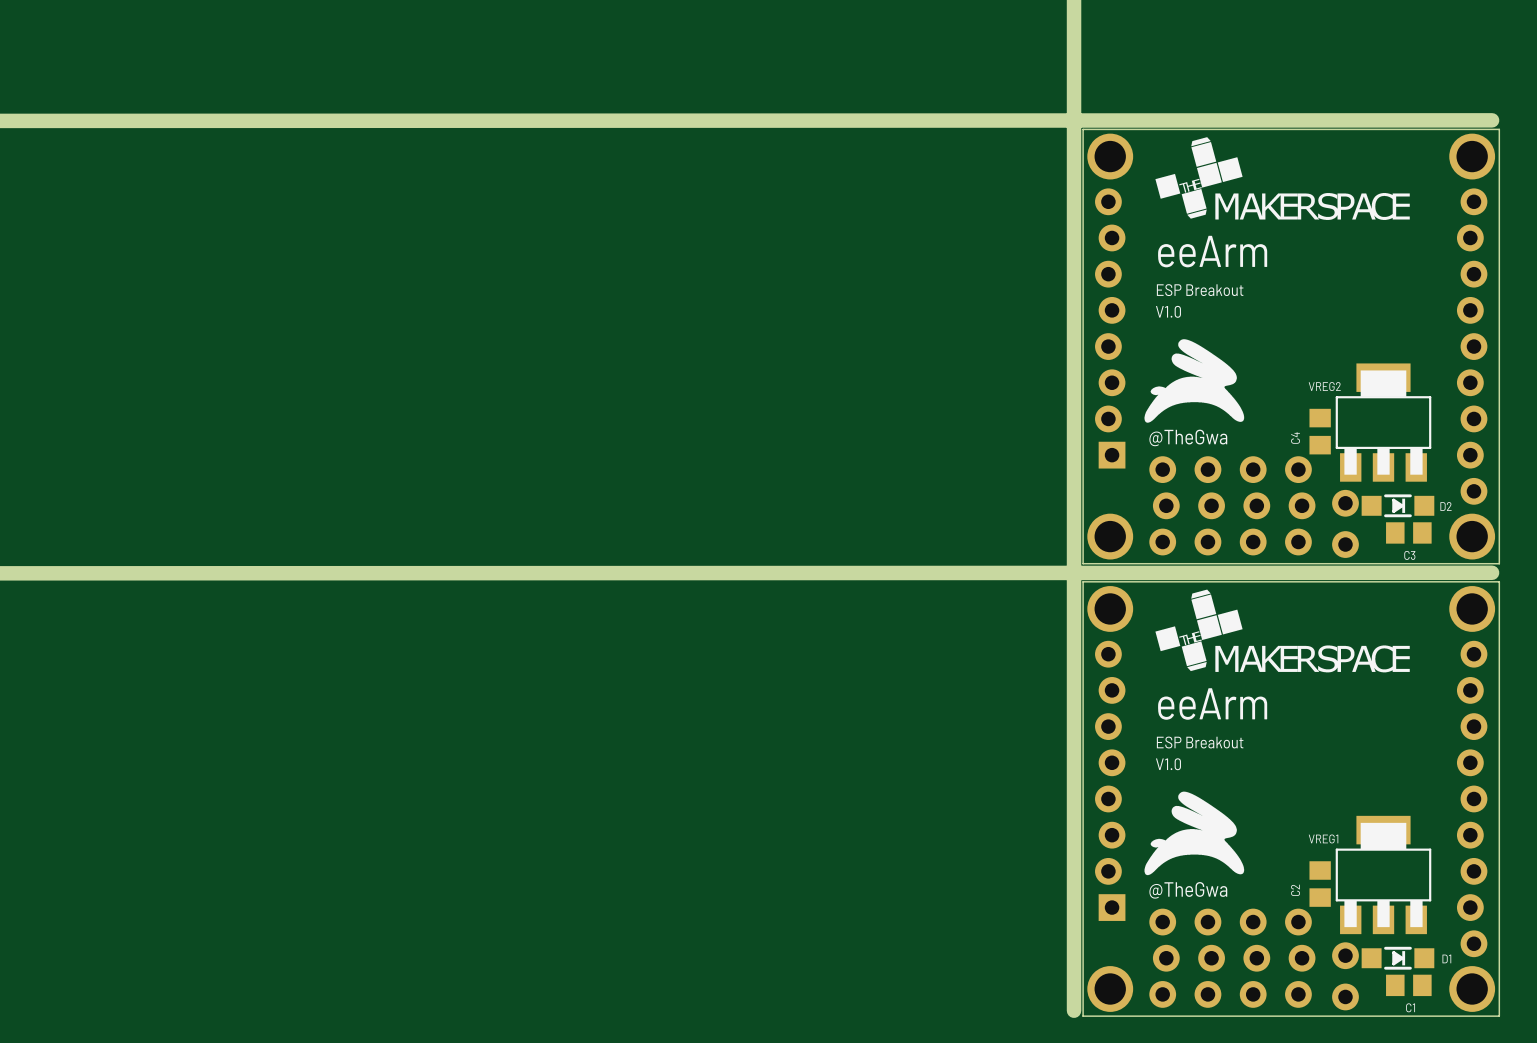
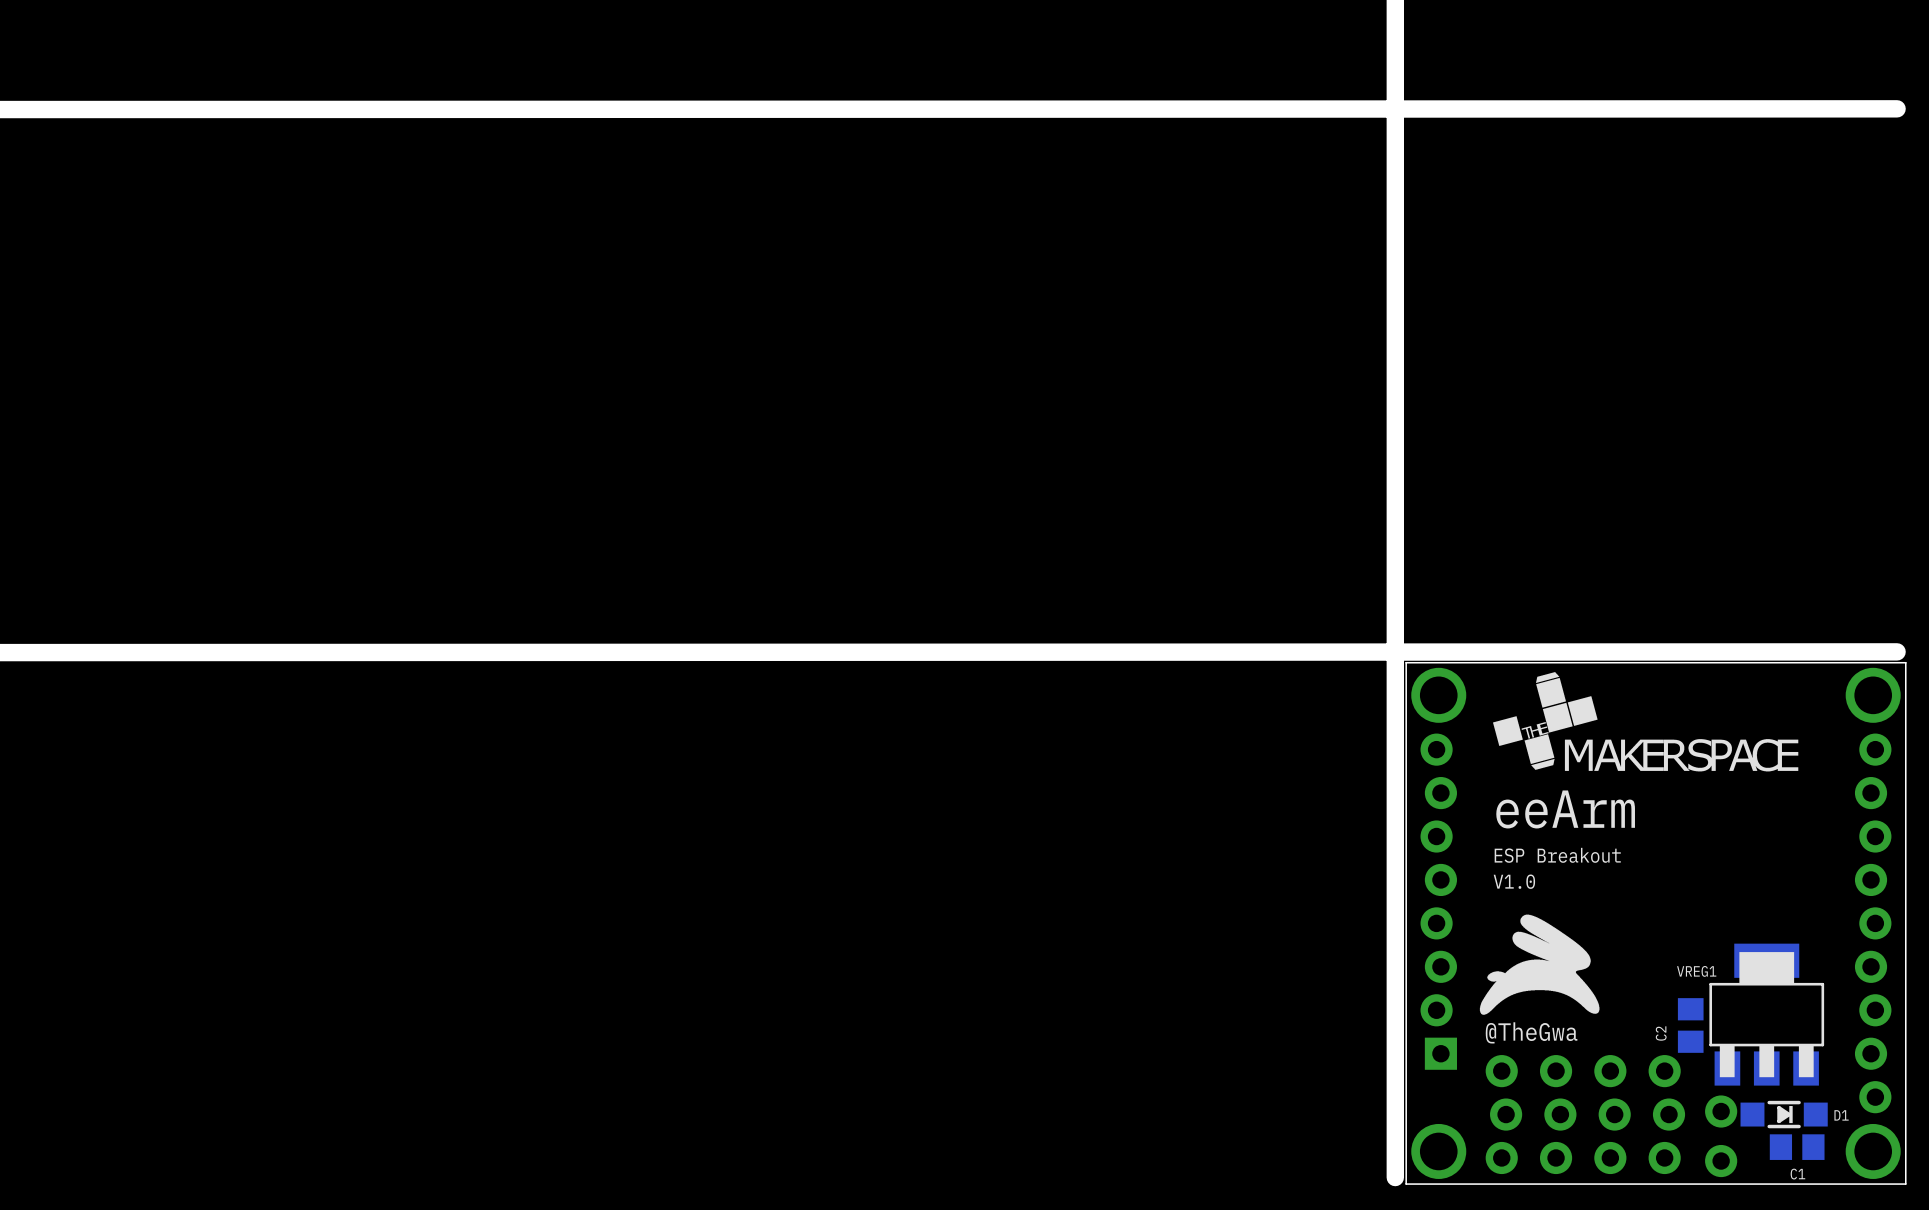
board edge: (1499, 129) (1499, 563) (1083, 563) (1083, 129) (1499, 129) -> none
drawing: [1155, 137, 1410, 220] -> none
part: (1110, 156) -> none
part: (1472, 156) -> none
text: eeArm (1212, 251) -> none
text: ESP Breakout (1200, 290) -> none
text: V1.0 (1168, 311) -> none
part: (1110, 328) -> none
drawing: [1144, 339, 1245, 423] -> none
part: (1472, 346) -> none
VREG2: (1383, 422) -> none
C4: (1320, 431) -> none
text: @TheGwa (1188, 437) -> none
part: (1164, 505) -> none
part: (1209, 505) -> none
part: (1255, 505) -> none
part: (1300, 505) -> none
D2: (1397, 505) -> none
part: (1345, 523) -> none
C3: (1408, 532) -> none
part: (1110, 536) -> none
part: (1472, 536) -> none

